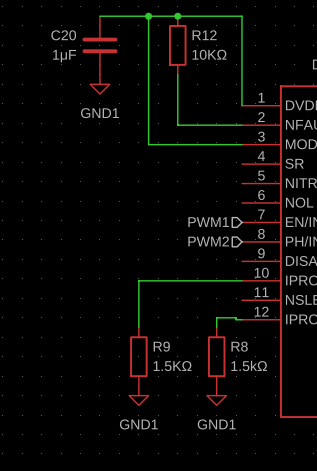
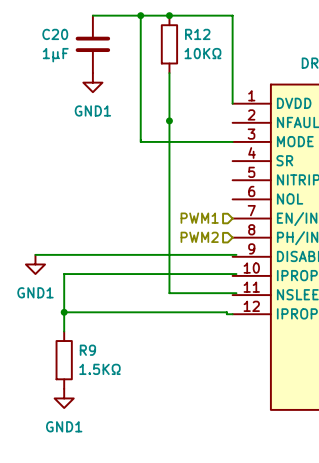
junction: none -> (169, 120)
wire: (177, 125) (241, 125) -> (169, 122) (169, 293) (236, 293)
wire: none -> (35, 254) (236, 254)
power symbol: none -> GND1 (35, 264)
wire: none -> (236, 274) (64, 274) (64, 331)
wire: (241, 280) (138, 280) (138, 327) -> none
junction: none -> (64, 312)
wire: (216, 317) (216, 327) -> (207, 312) (64, 312)
R9 position: (138, 356) -> (64, 360)
R8: 1.5kΩ (216, 356) -> none
power symbol position: GND1 (138, 395) -> GND1 (64, 398)
power symbol: GND1 (216, 395) -> none

